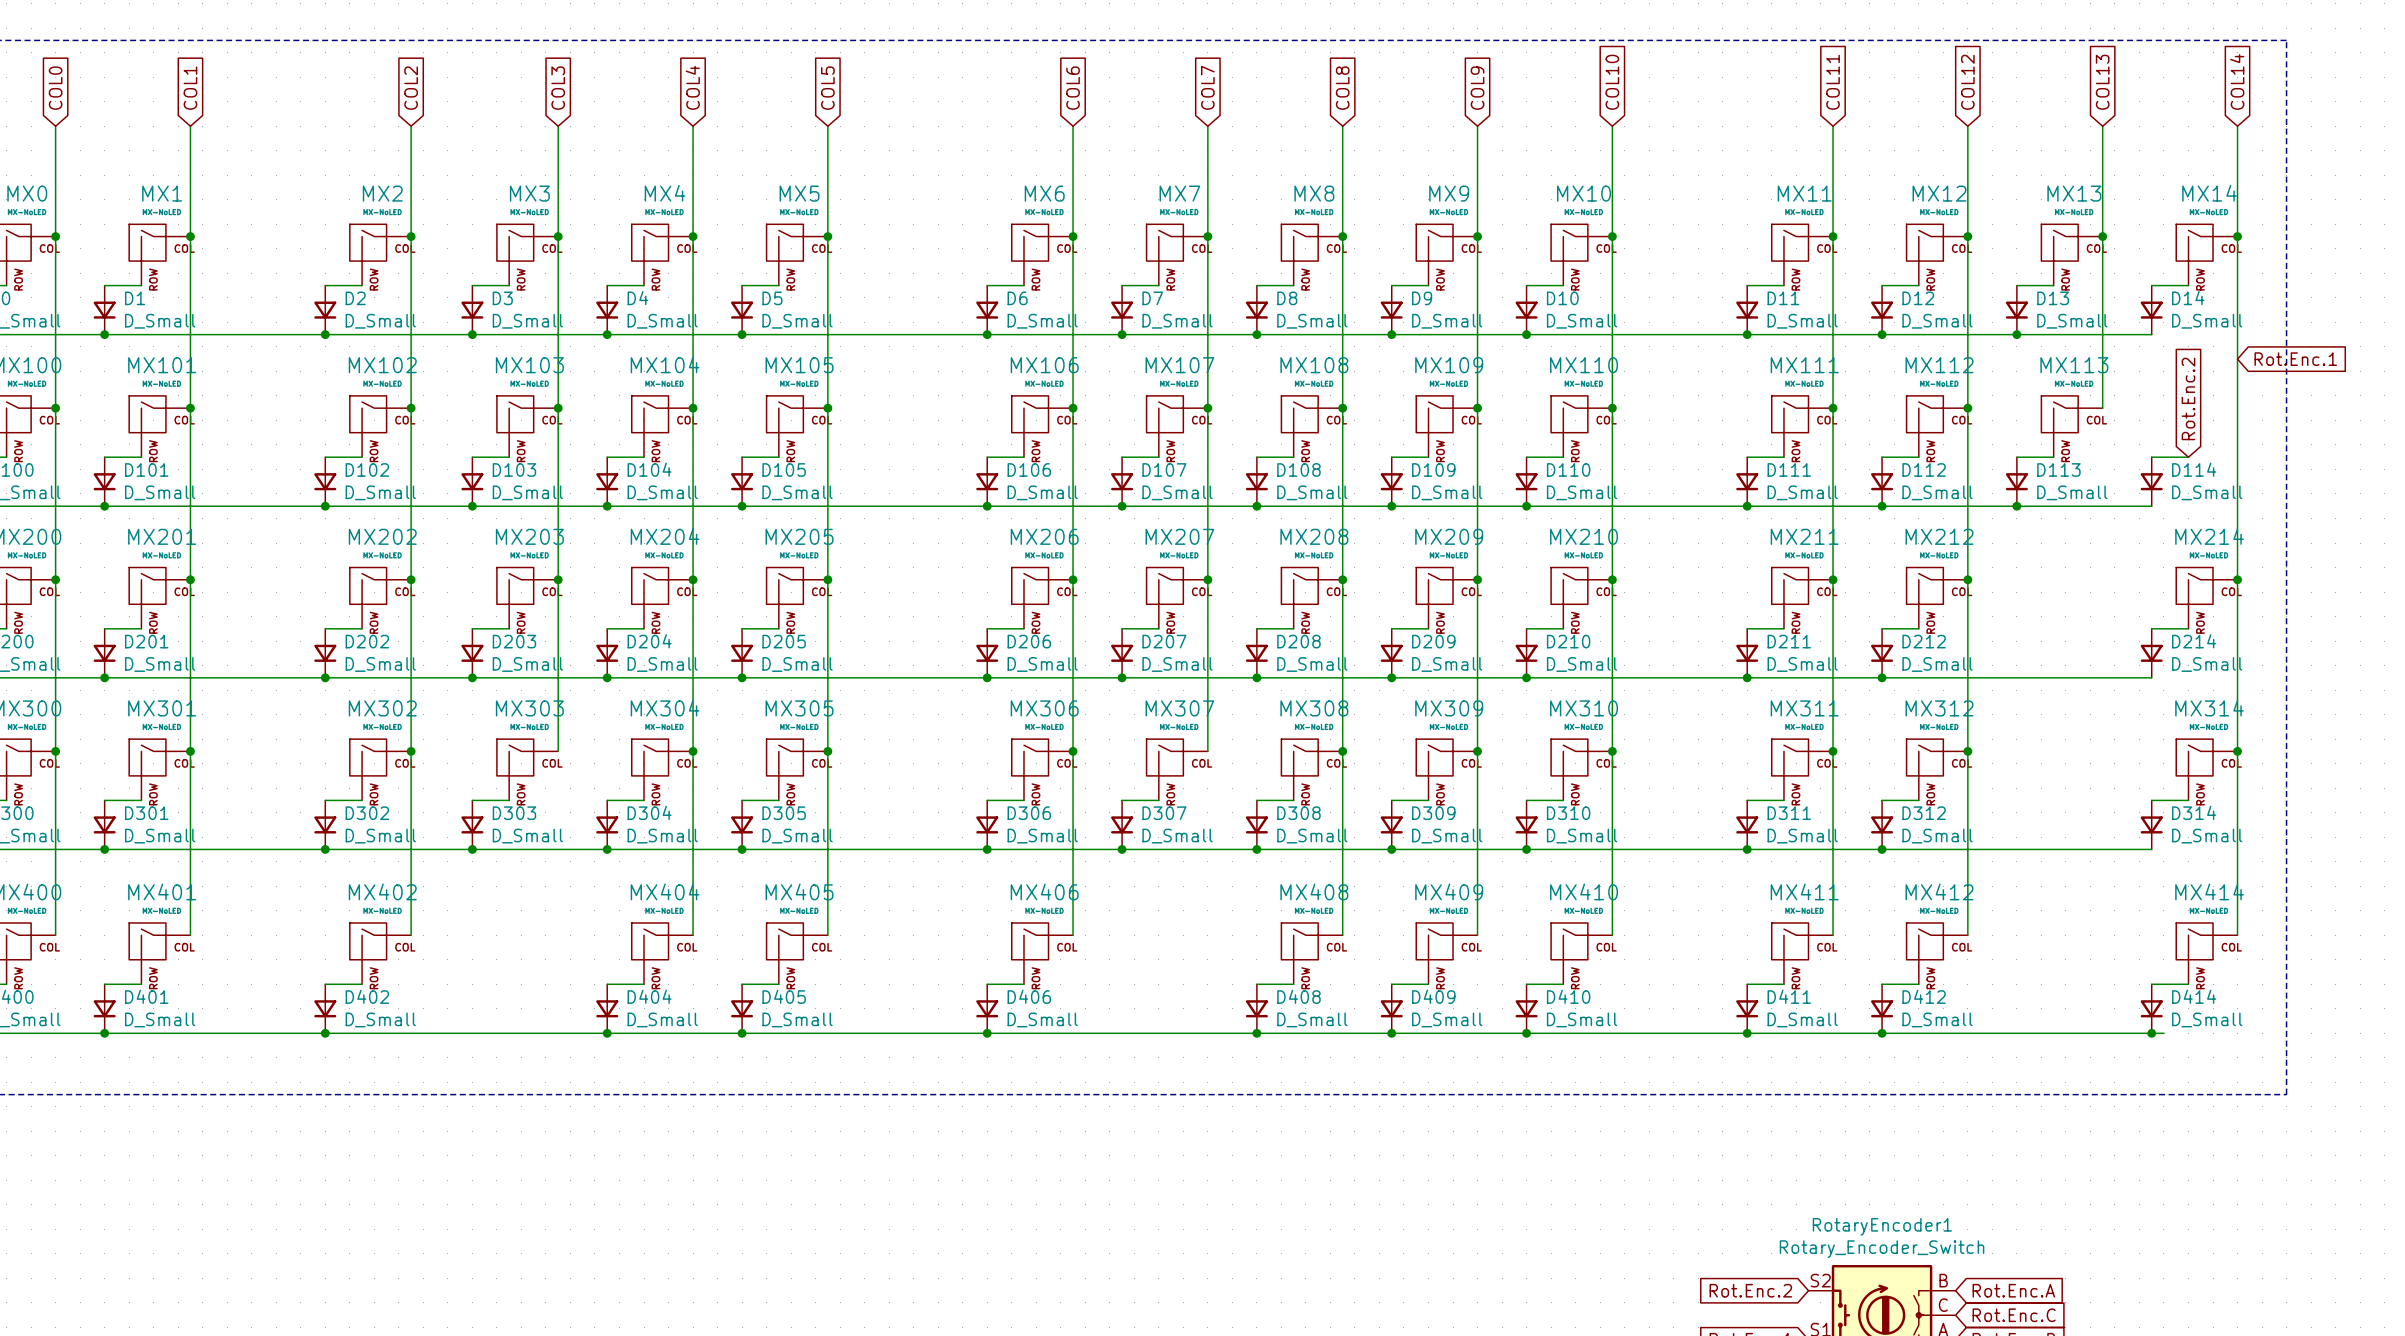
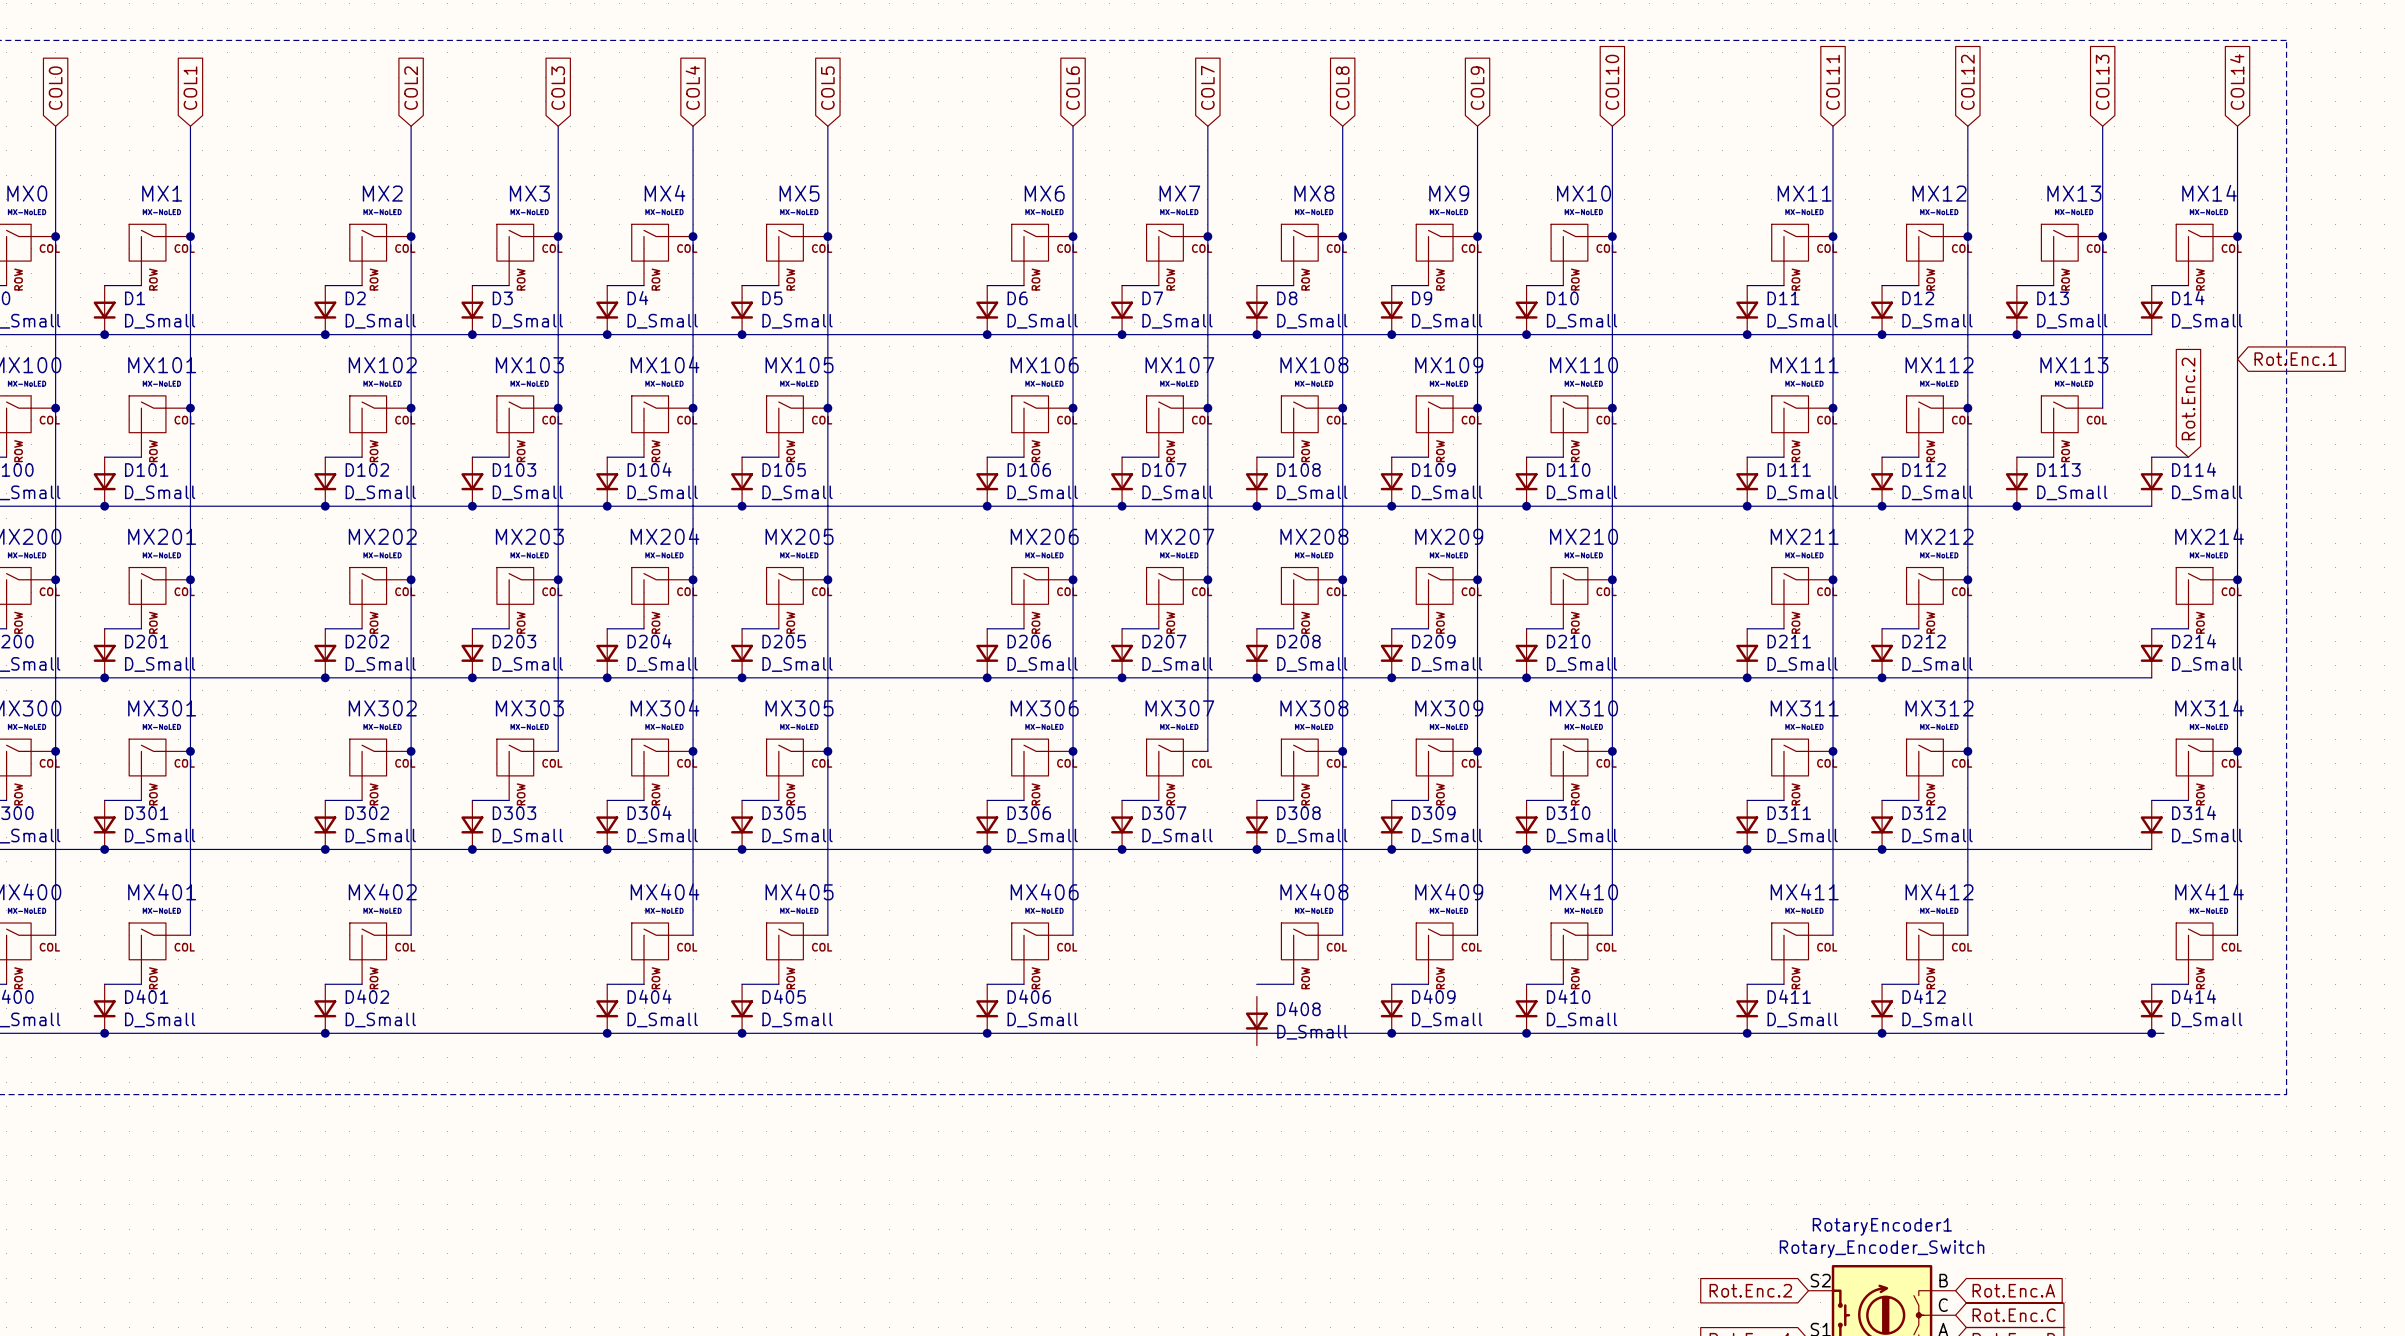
D408 position: (1256, 1008) -> (1256, 1021)
junction: (1256, 1033) -> none

